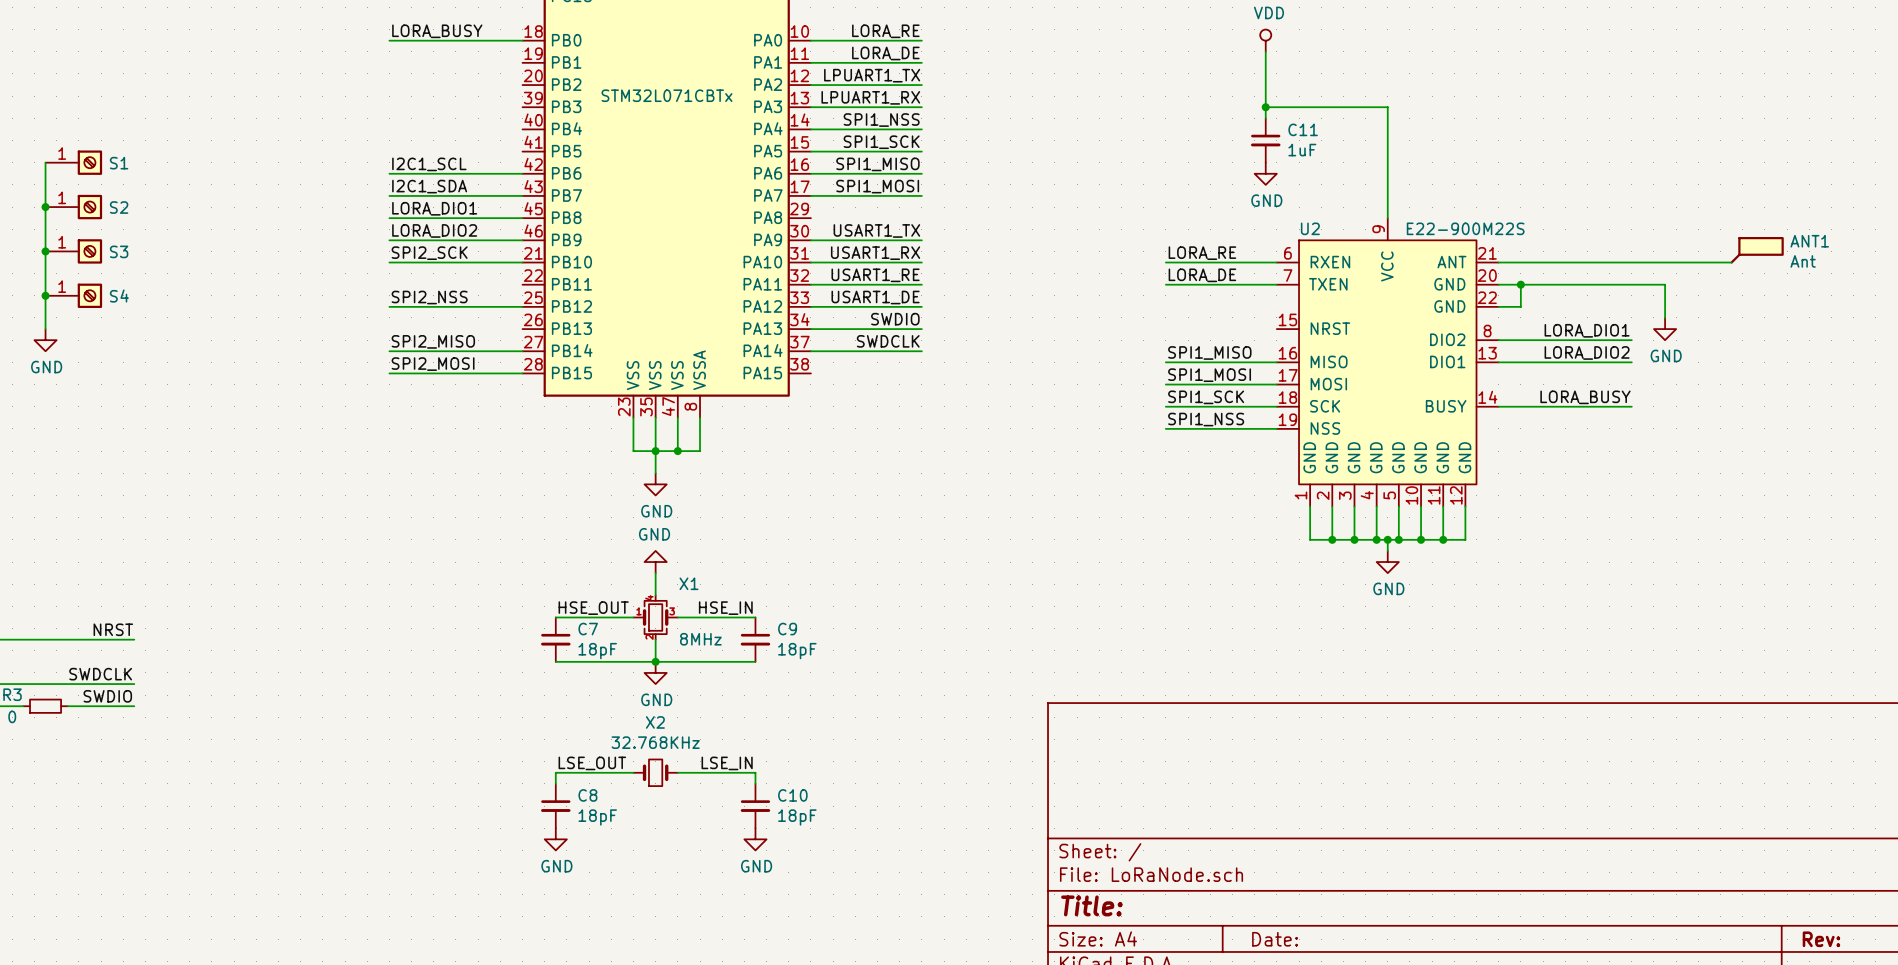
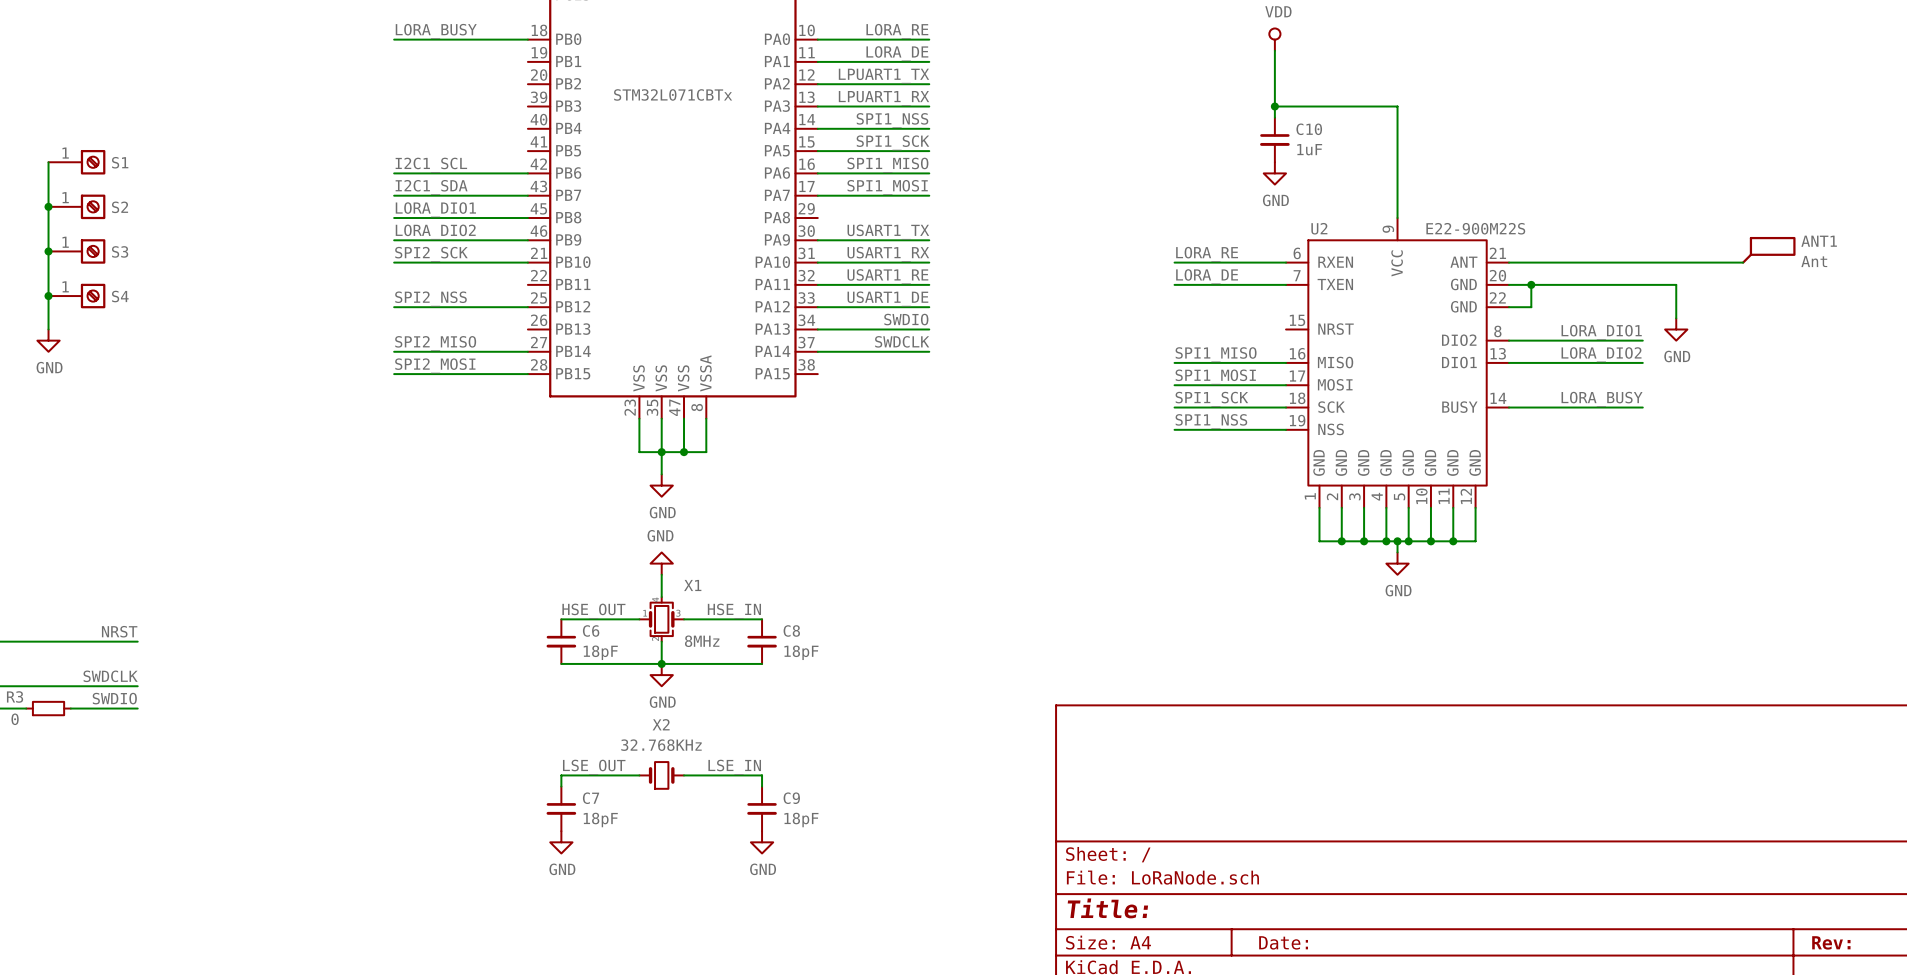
C11 name: C11 (1303, 129) -> C10 (1309, 129)
C7 name: C7 (588, 629) -> C6 (591, 630)
C9 name: C9 (787, 629) -> C8 (791, 630)
C8 name: C8 (587, 795) -> C7 (591, 798)
C10 name: C10 (792, 795) -> C9 (791, 798)

